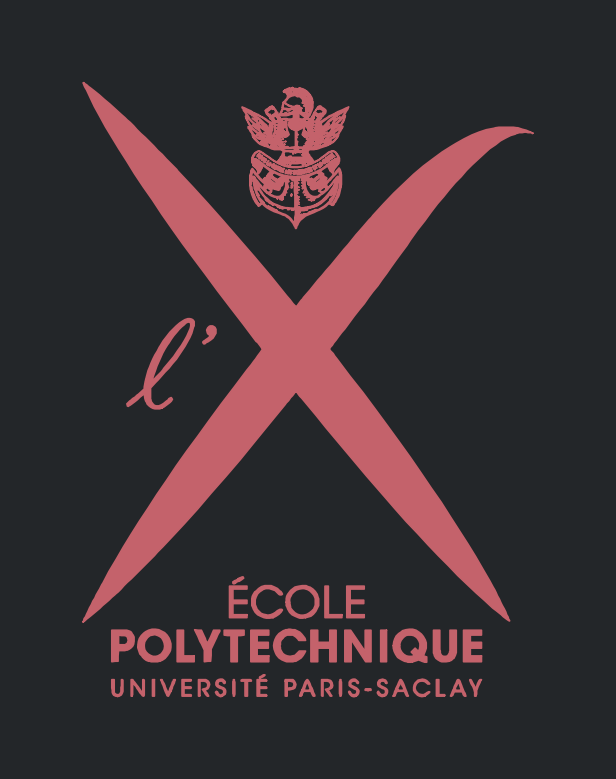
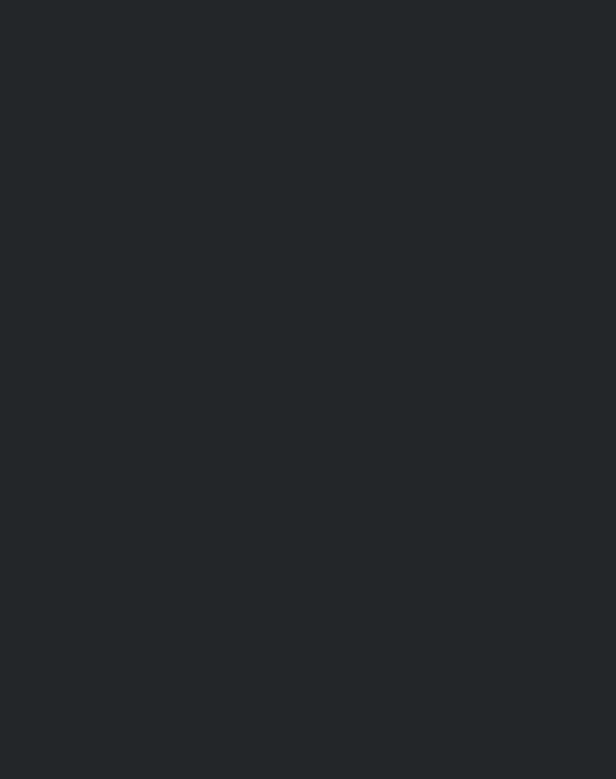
power symbol: (307, 389) -> none

